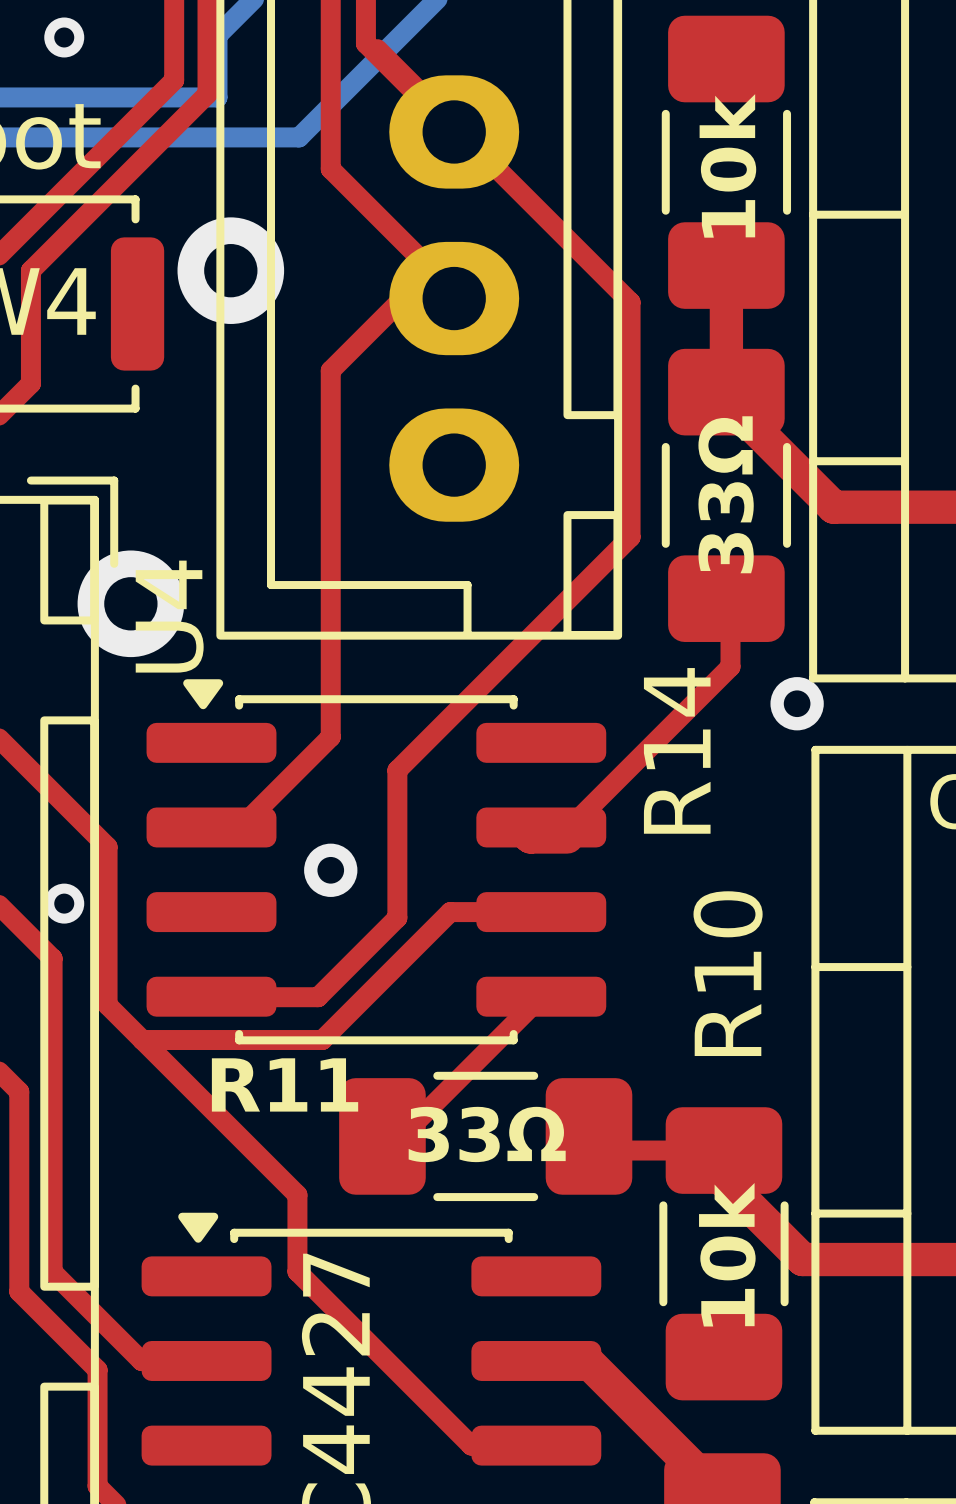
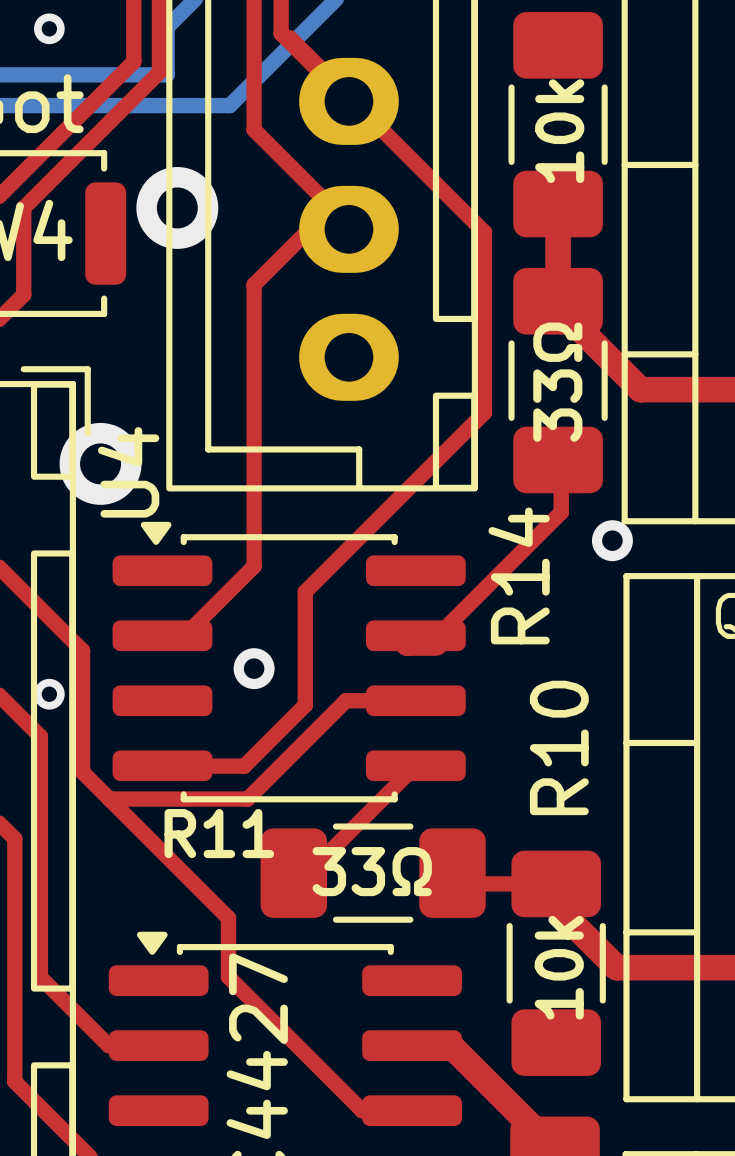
top track: (19, 1291) (97, 1369) (97, 1486) -> (14, 992) (14, 1081) (74, 1141)

